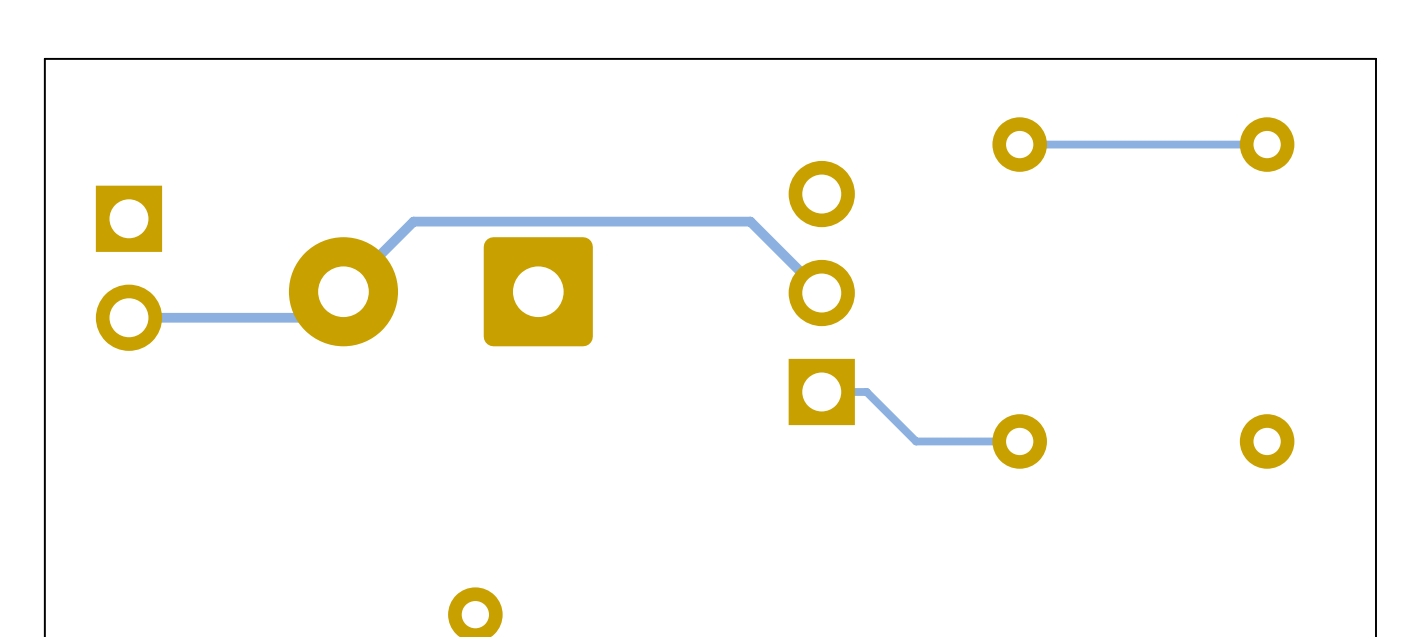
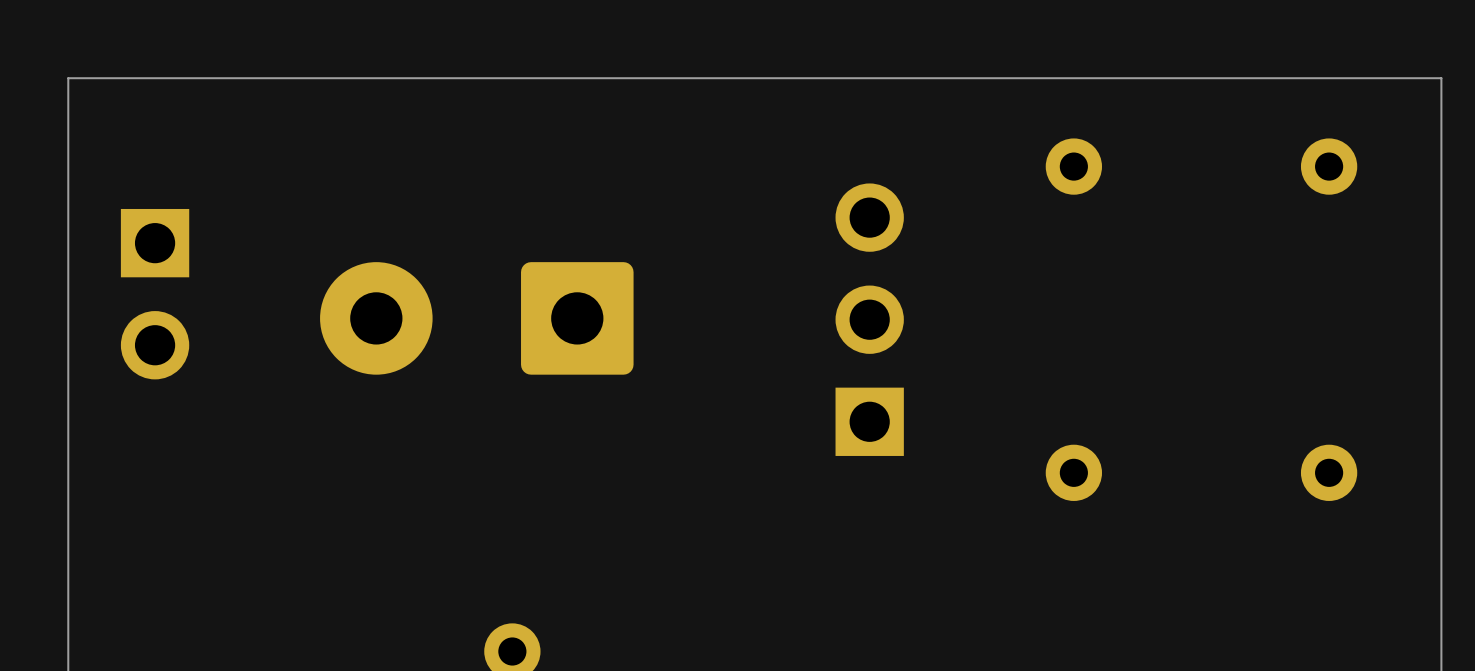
track: (1267, 144) (1019, 144) -> none
track: (821, 293) (750, 221) (413, 221) (317, 317) (128, 317) -> none
track: (821, 391) (866, 391) (916, 441) (1019, 441) -> none

